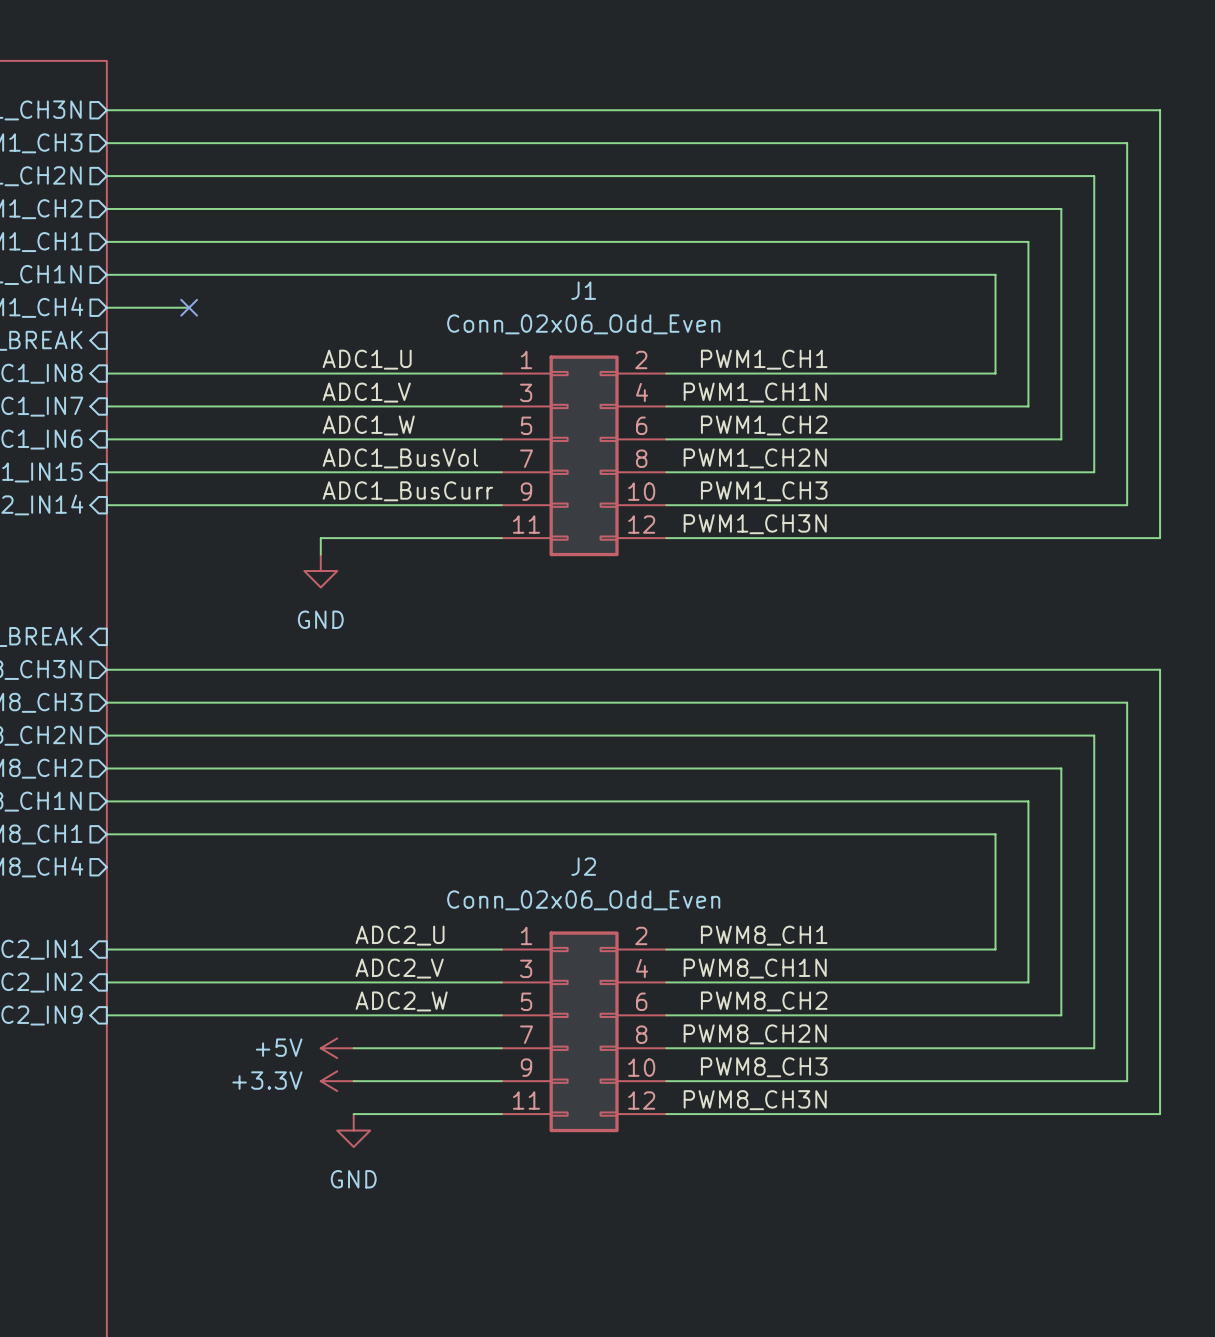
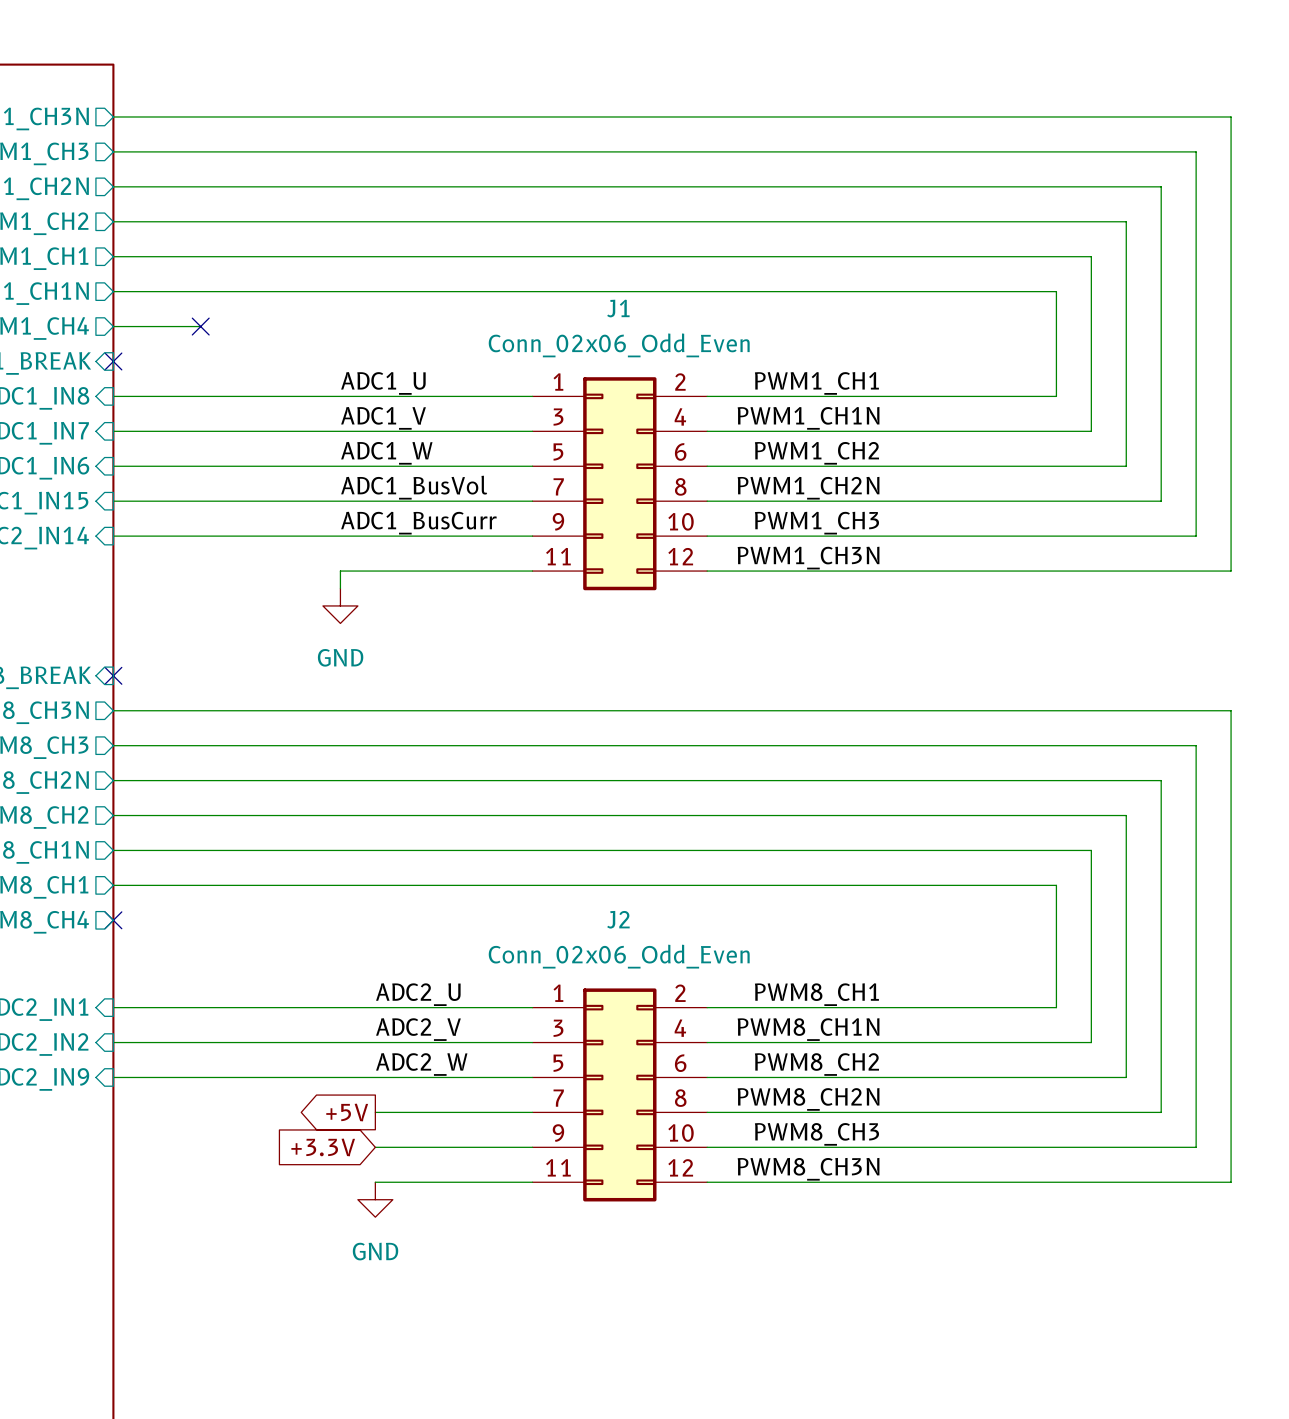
no-connect mark: none -> (113, 361)
no-connect mark: none -> (113, 675)
no-connect mark: none -> (113, 920)
global label: none -> +5V (347, 1112)
power symbol: +5V (337, 1048) -> none
global label: none -> +3.3V (323, 1147)
power symbol: +3.3V (337, 1081) -> none

